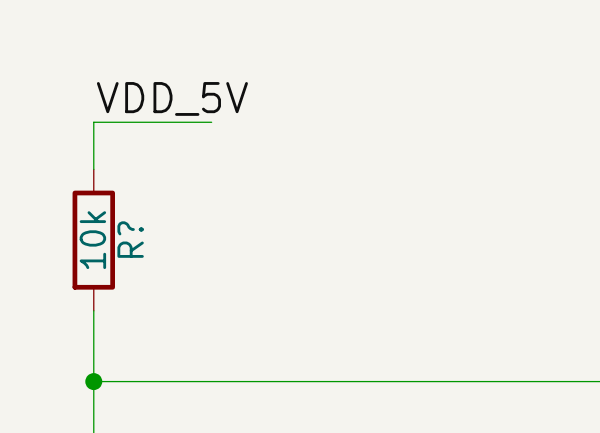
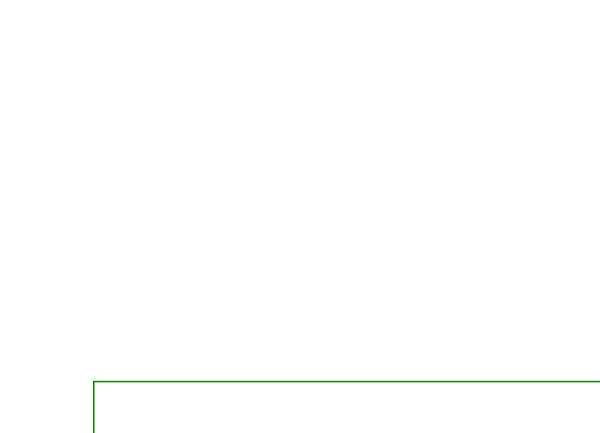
label: VDD_5V (172, 98) -> none
wire: (211, 122) (93, 122) (93, 169) -> none
R?: 10k (93, 240) -> none
wire: (93, 310) (93, 381) -> none
junction: (93, 381) -> none

